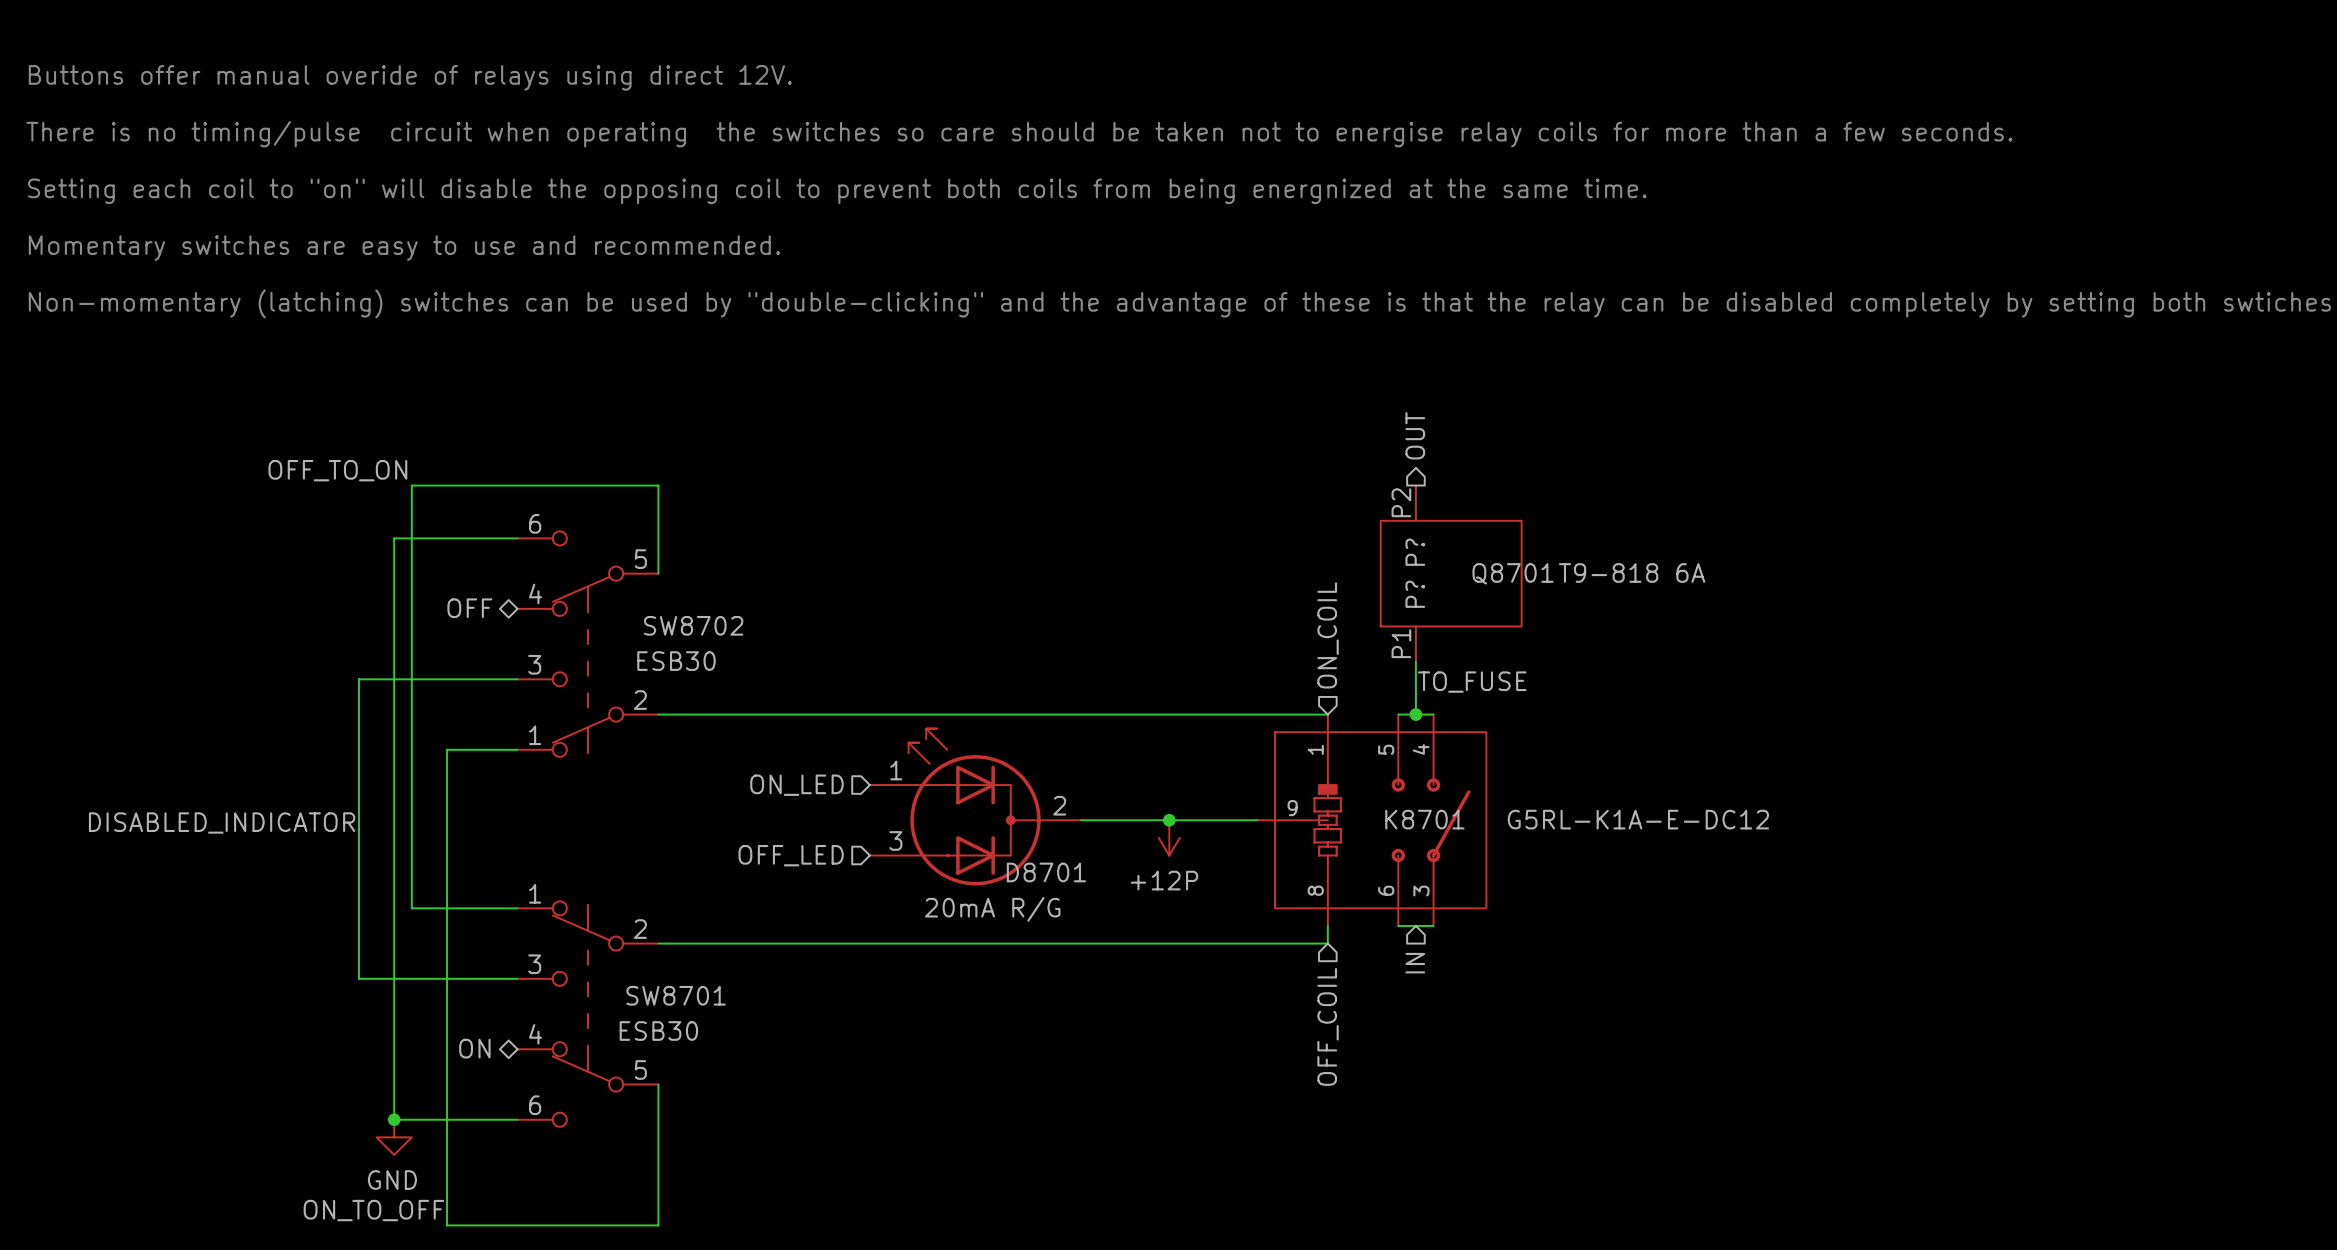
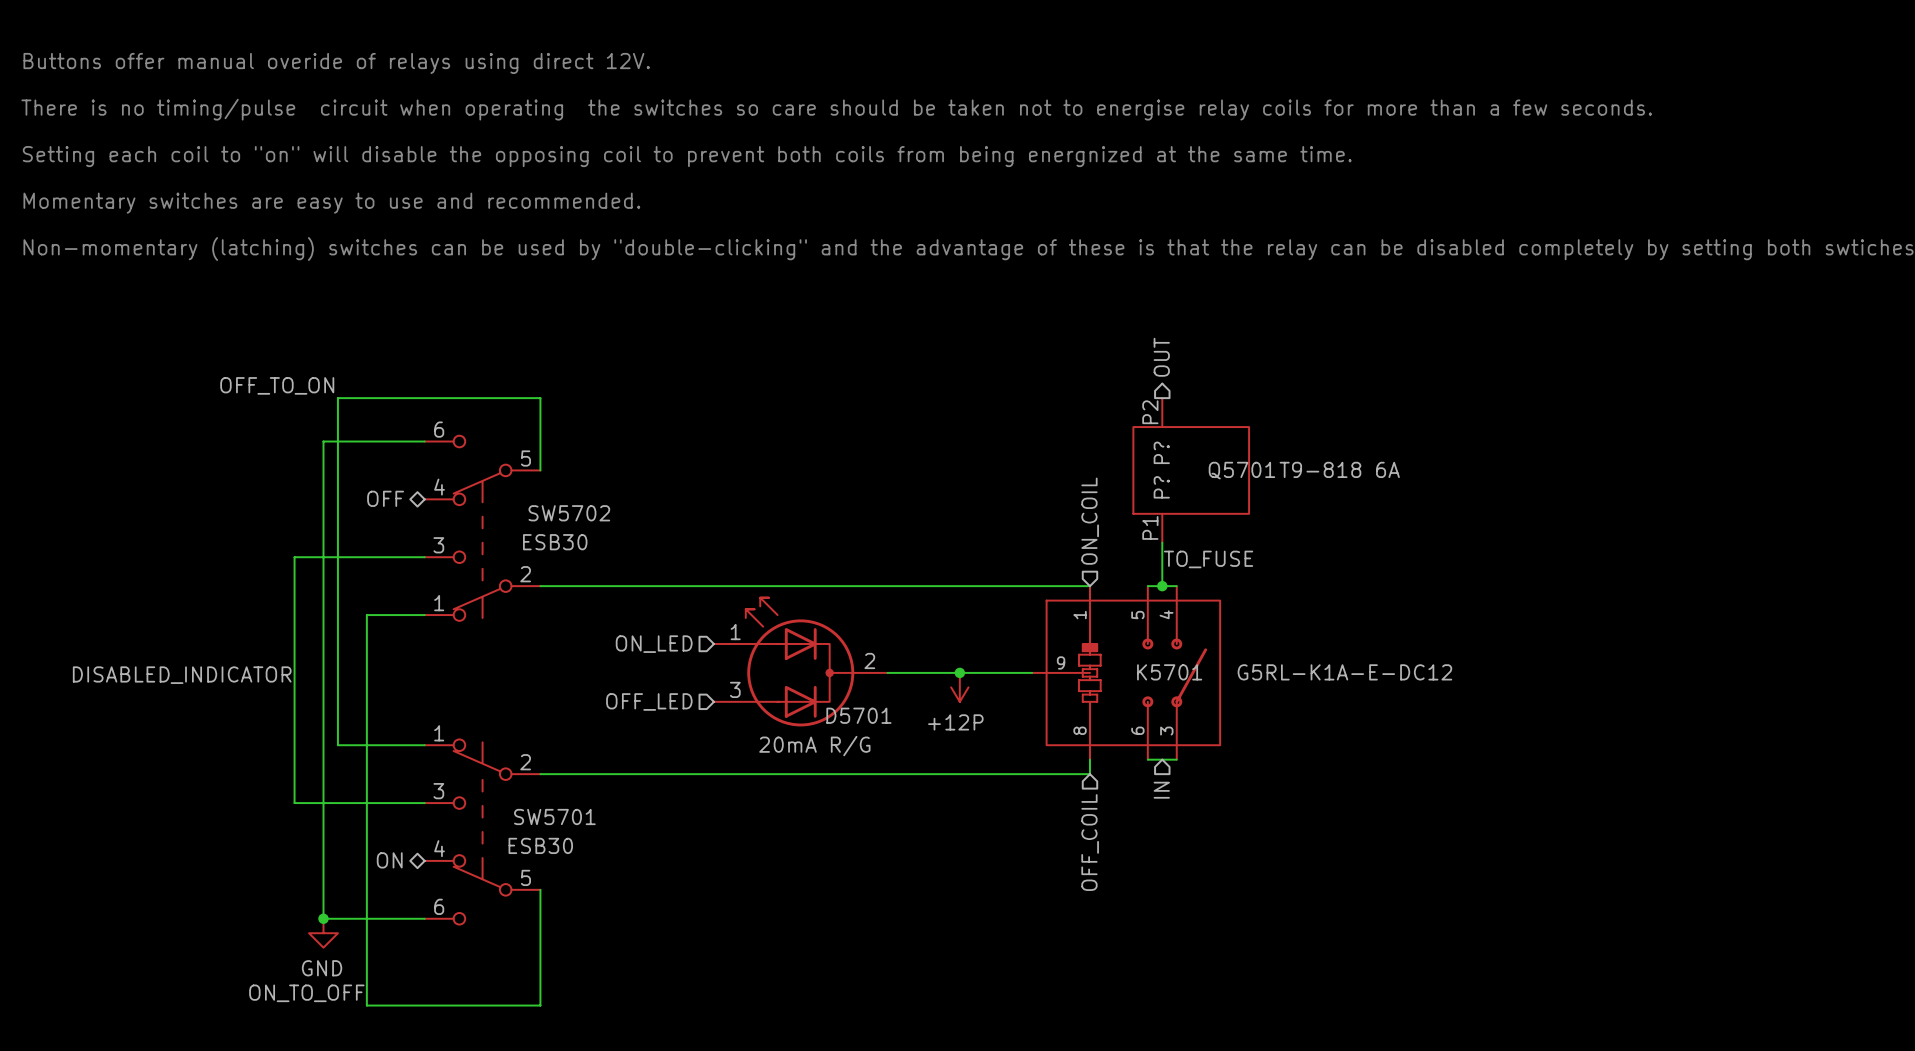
Q8701 name: Q8701 (1512, 573) -> Q5701 (1241, 470)
SW8702 name: SW8702 (693, 625) -> SW5702 (569, 513)
K8701 name: K8701 (1424, 819) -> K5701 (1169, 672)
D8701 name: D8701 (1046, 872) -> D5701 (858, 715)
SW8701 name: SW8701 (676, 995) -> SW5701 (554, 816)

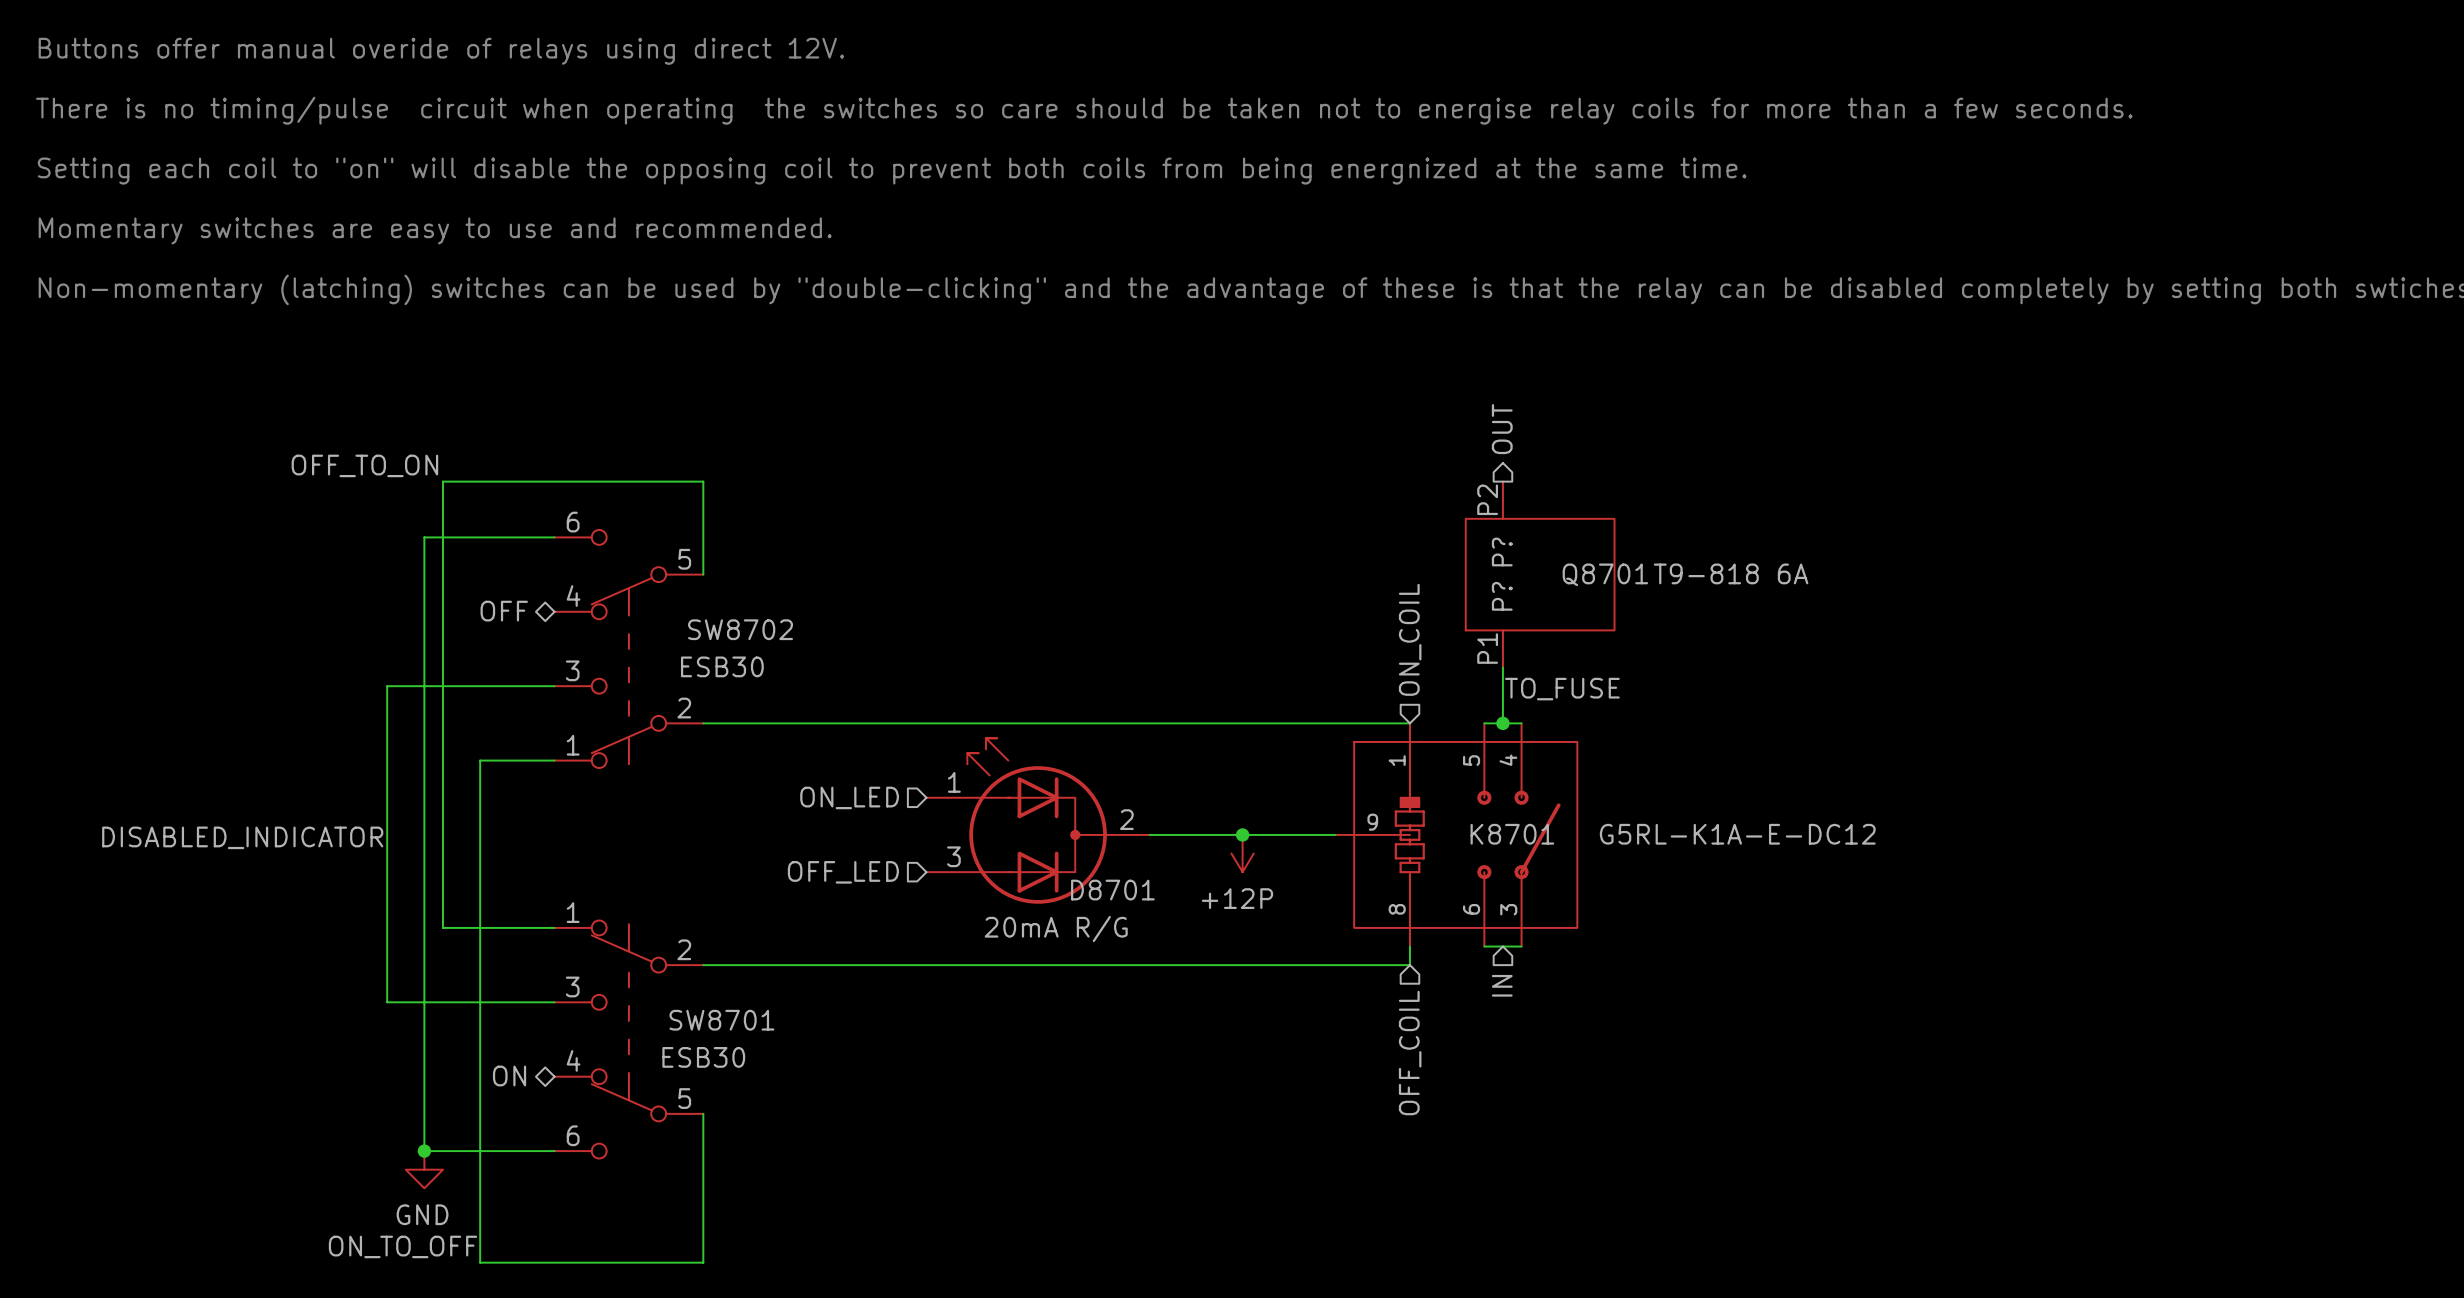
Q5701 name: Q5701 (1241, 470) -> Q8701 (1605, 574)
SW5702 name: SW5702 (569, 513) -> SW8702 (740, 629)
K5701 name: K5701 (1169, 672) -> K8701 (1512, 834)
D5701 name: D5701 (858, 715) -> D8701 (1112, 890)
SW5701 name: SW5701 (554, 816) -> SW8701 (721, 1020)

